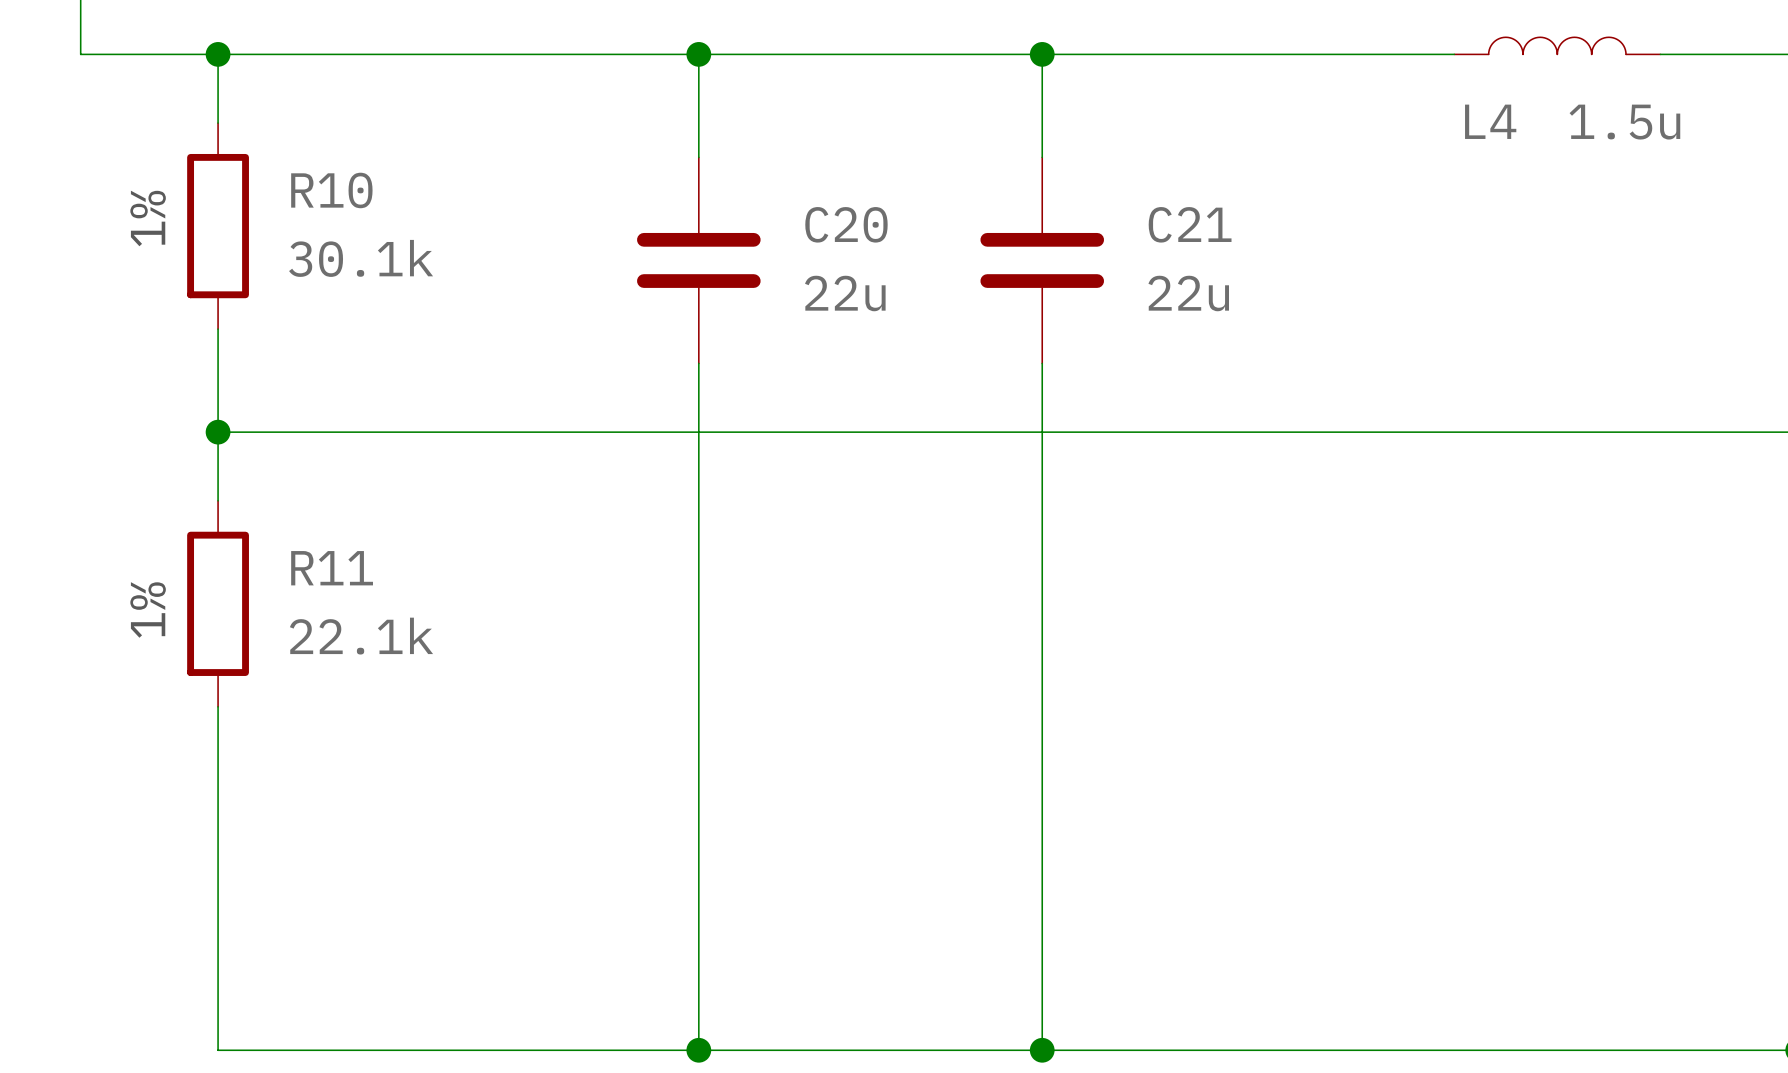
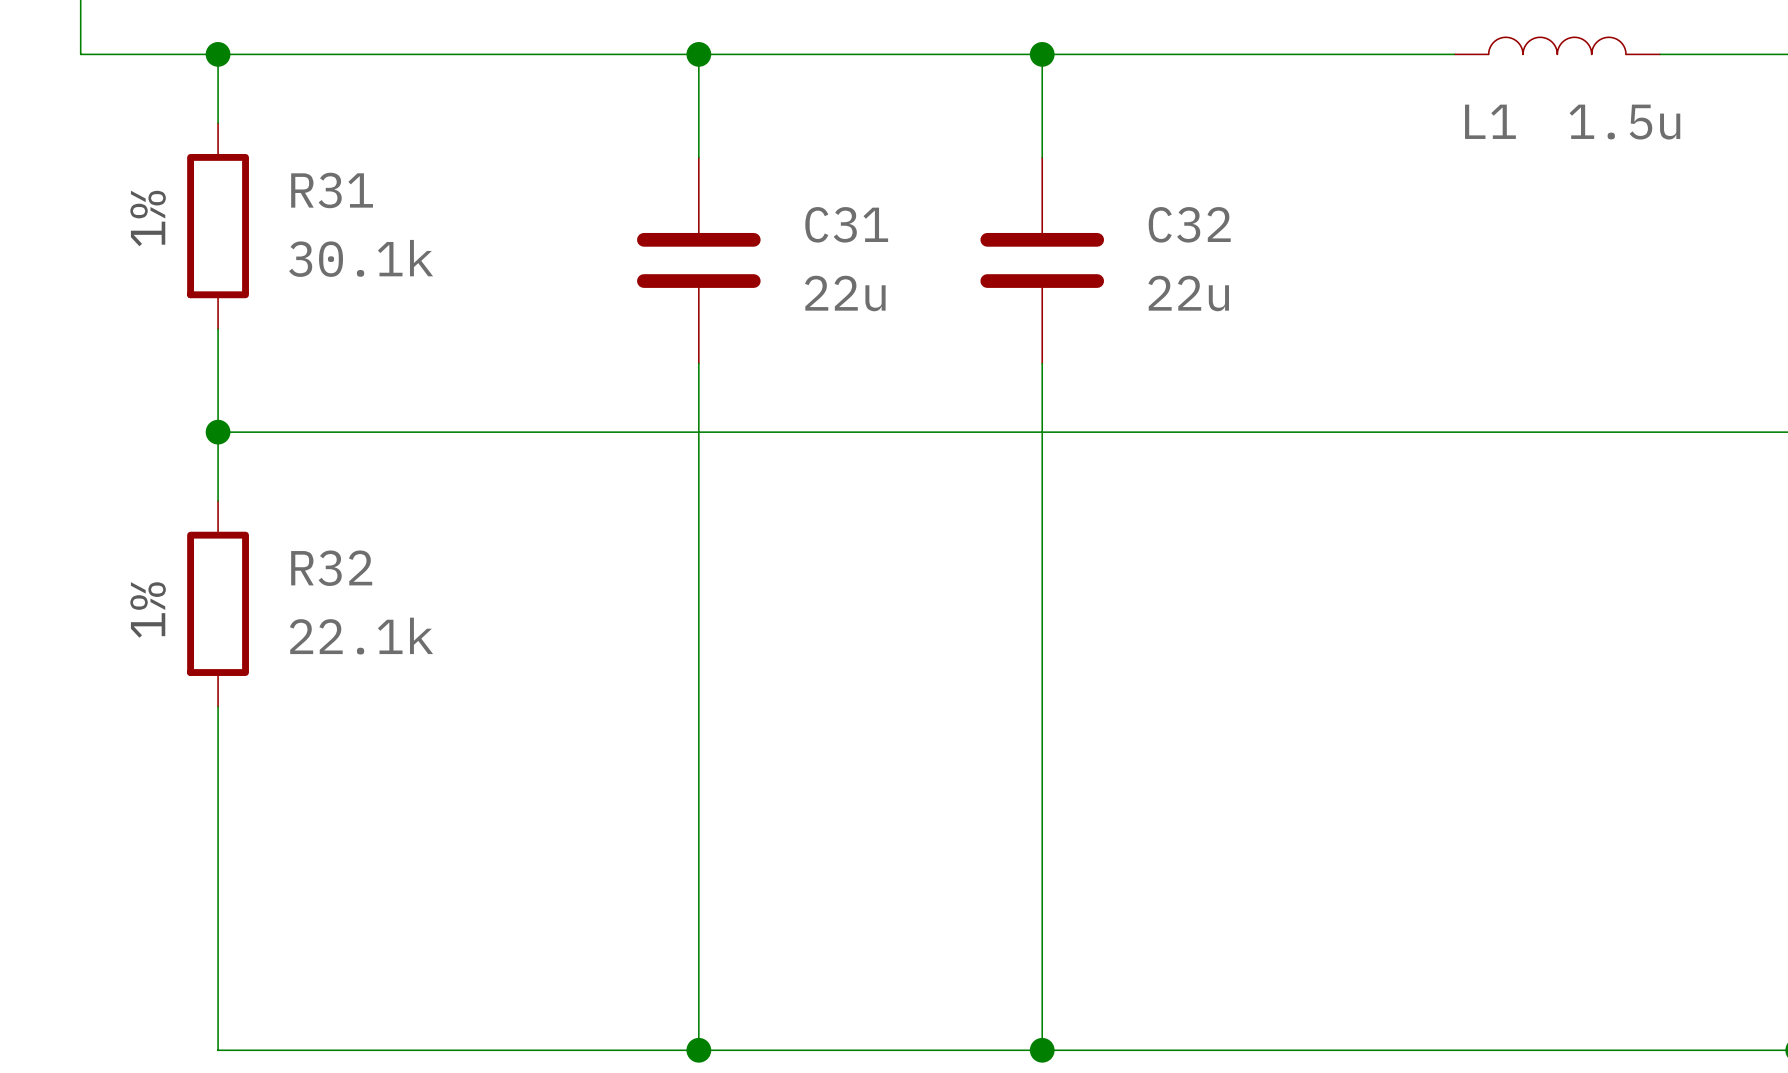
L4 name: L4 (1490, 121) -> L1 (1490, 121)
R10 name: R10 (331, 190) -> R31 (332, 190)
C20 name: C20 (846, 224) -> C31 (846, 224)
C21 name: C21 (1190, 224) -> C32 (1189, 224)
R11 name: R11 (332, 568) -> R32 (331, 568)

